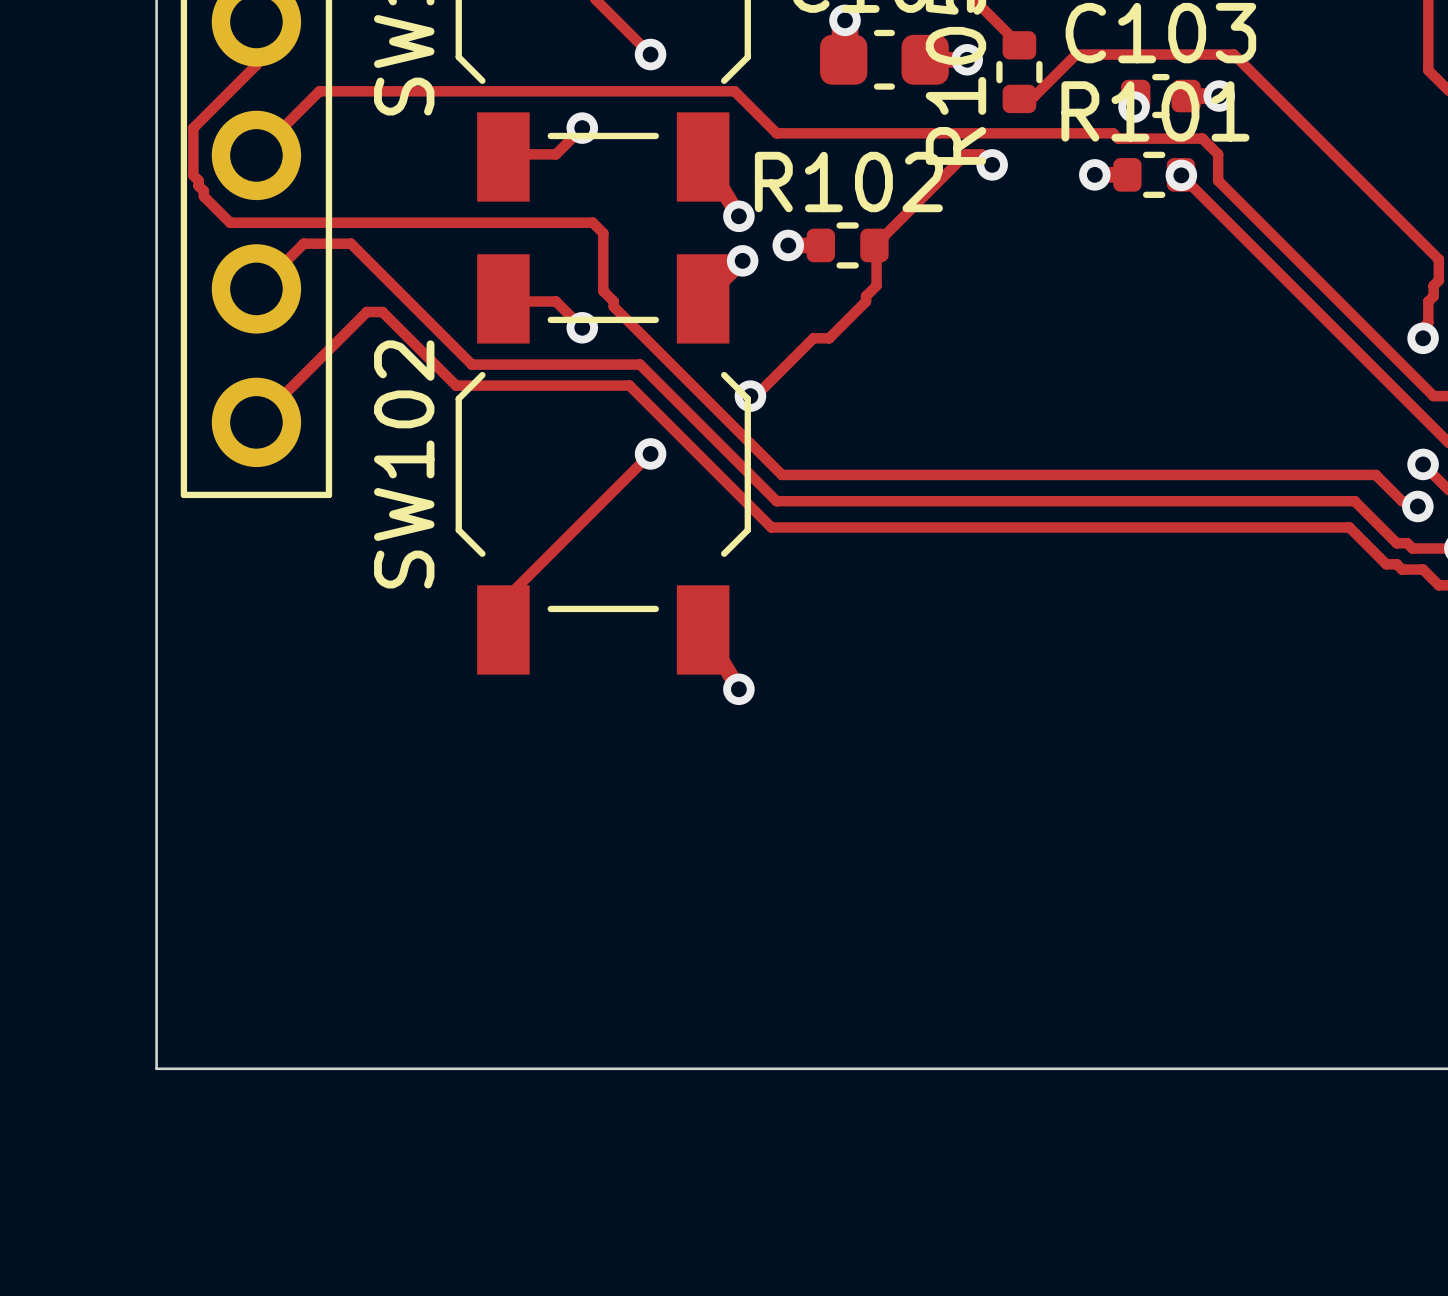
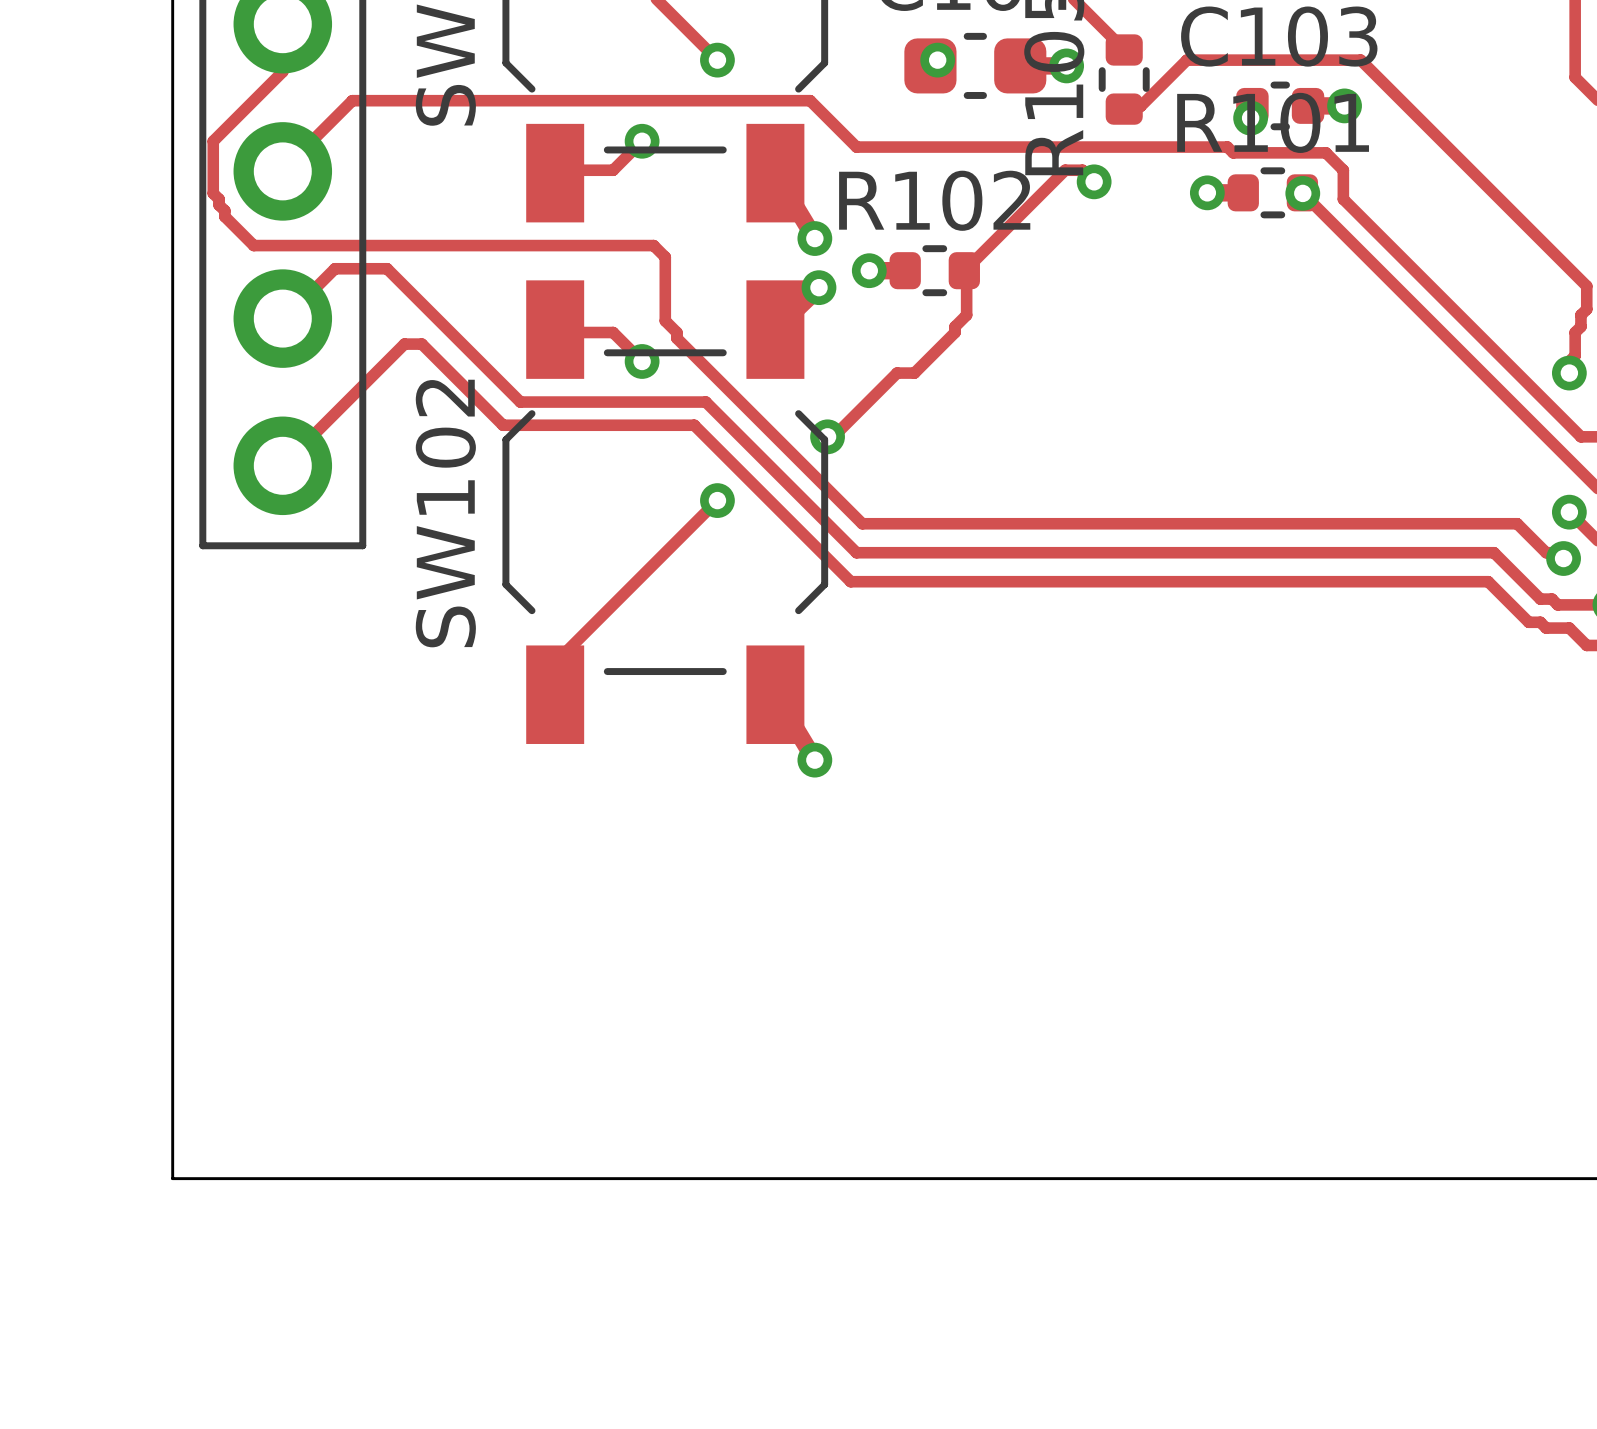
via position: (845, 20) -> (937, 60)

